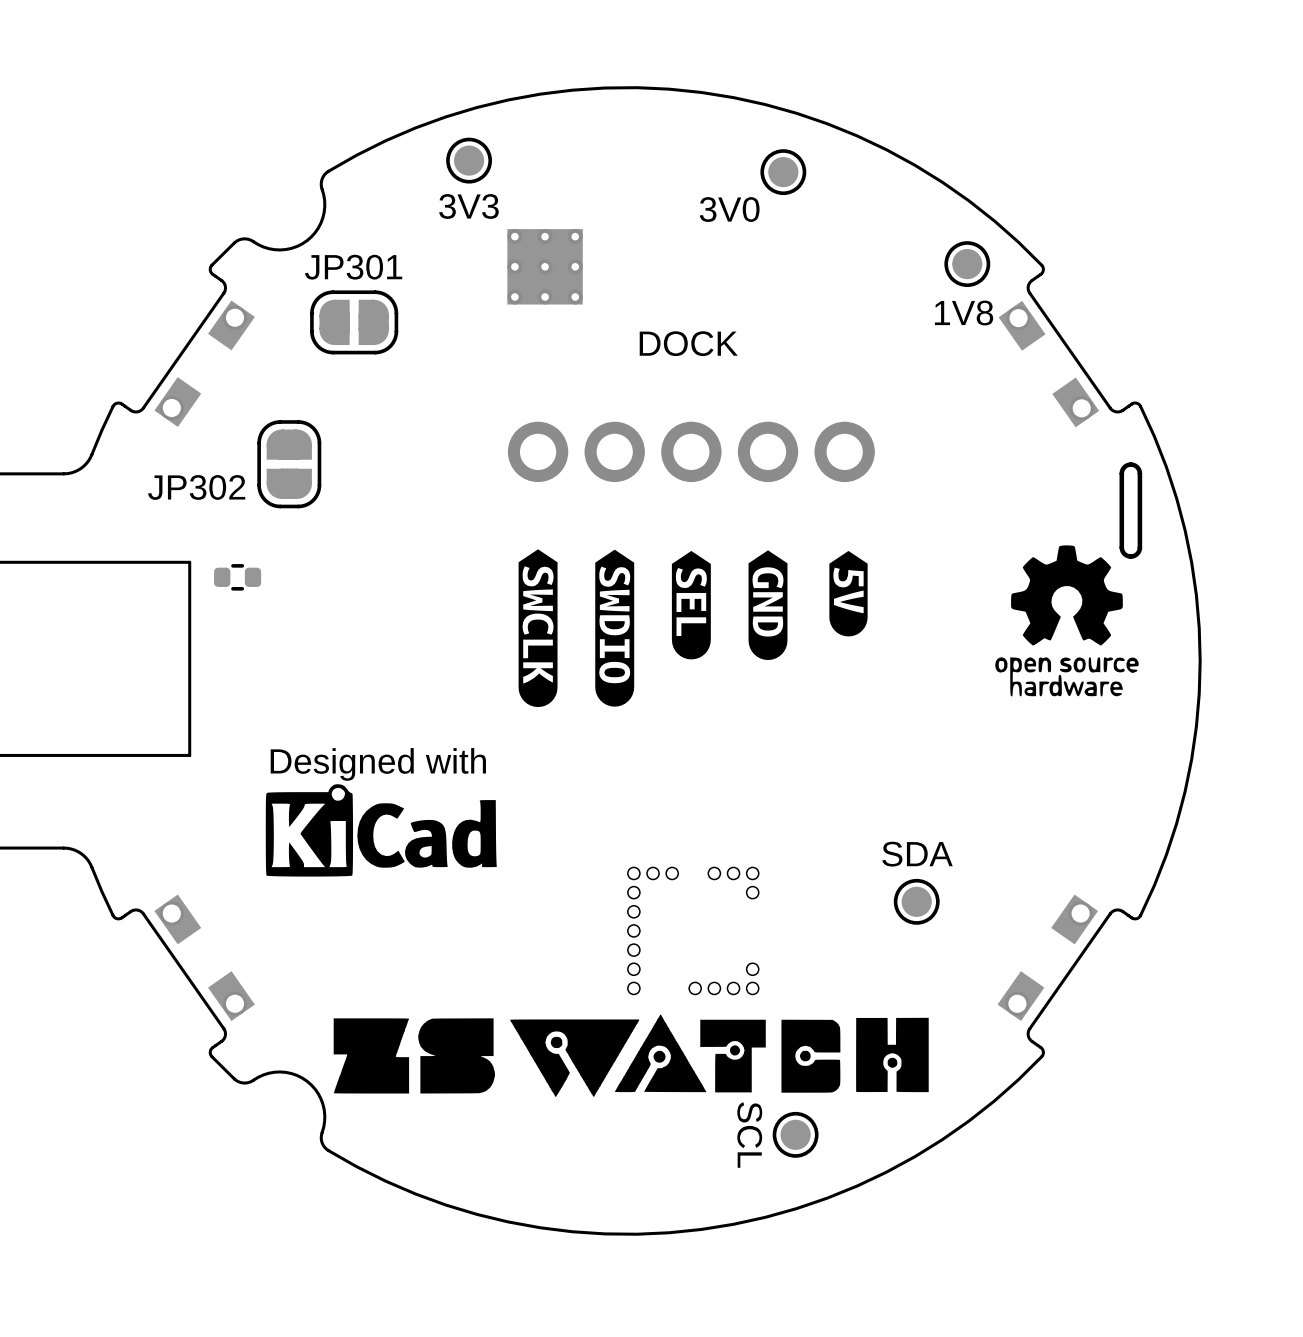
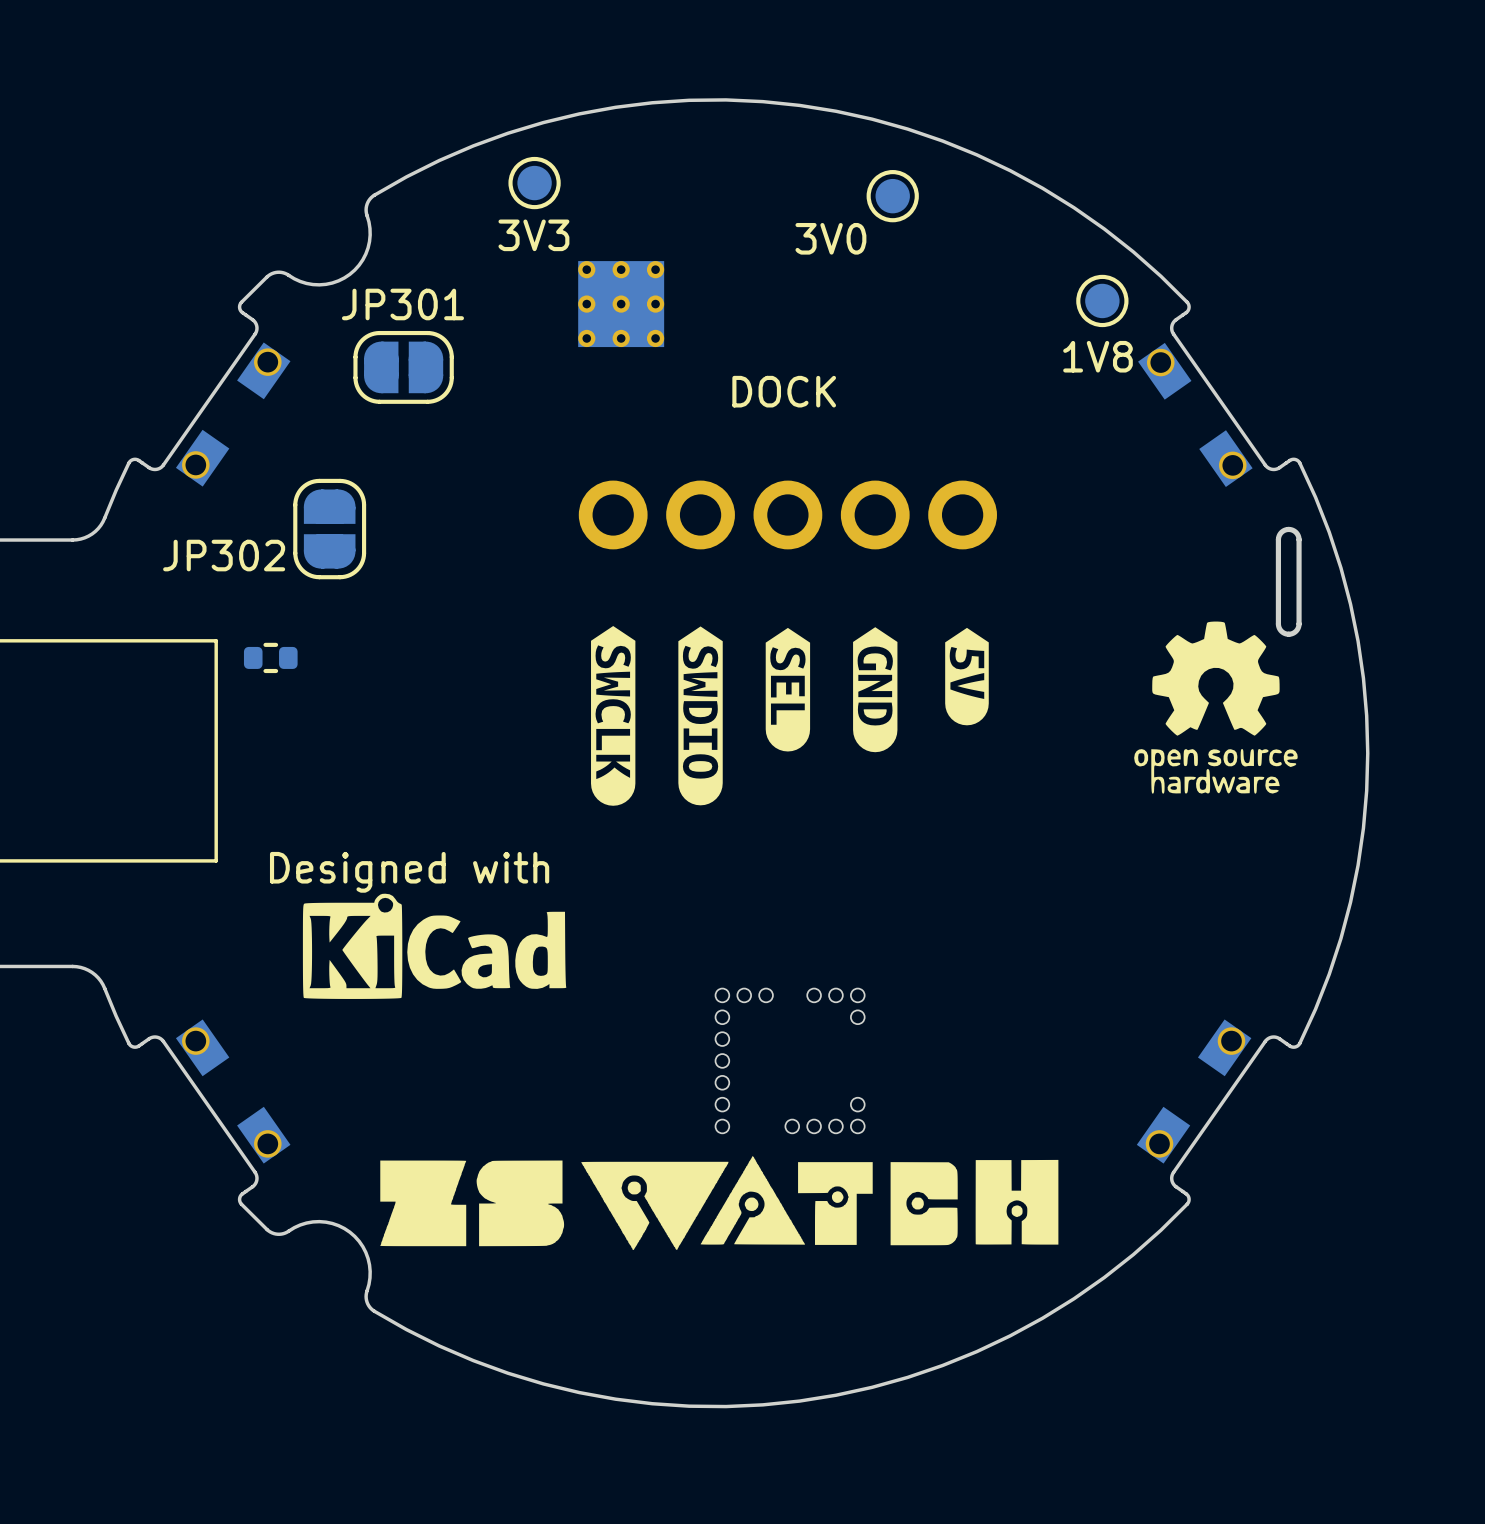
part: SDA (916, 901) -> none
part: SCL (795, 1134) -> none

